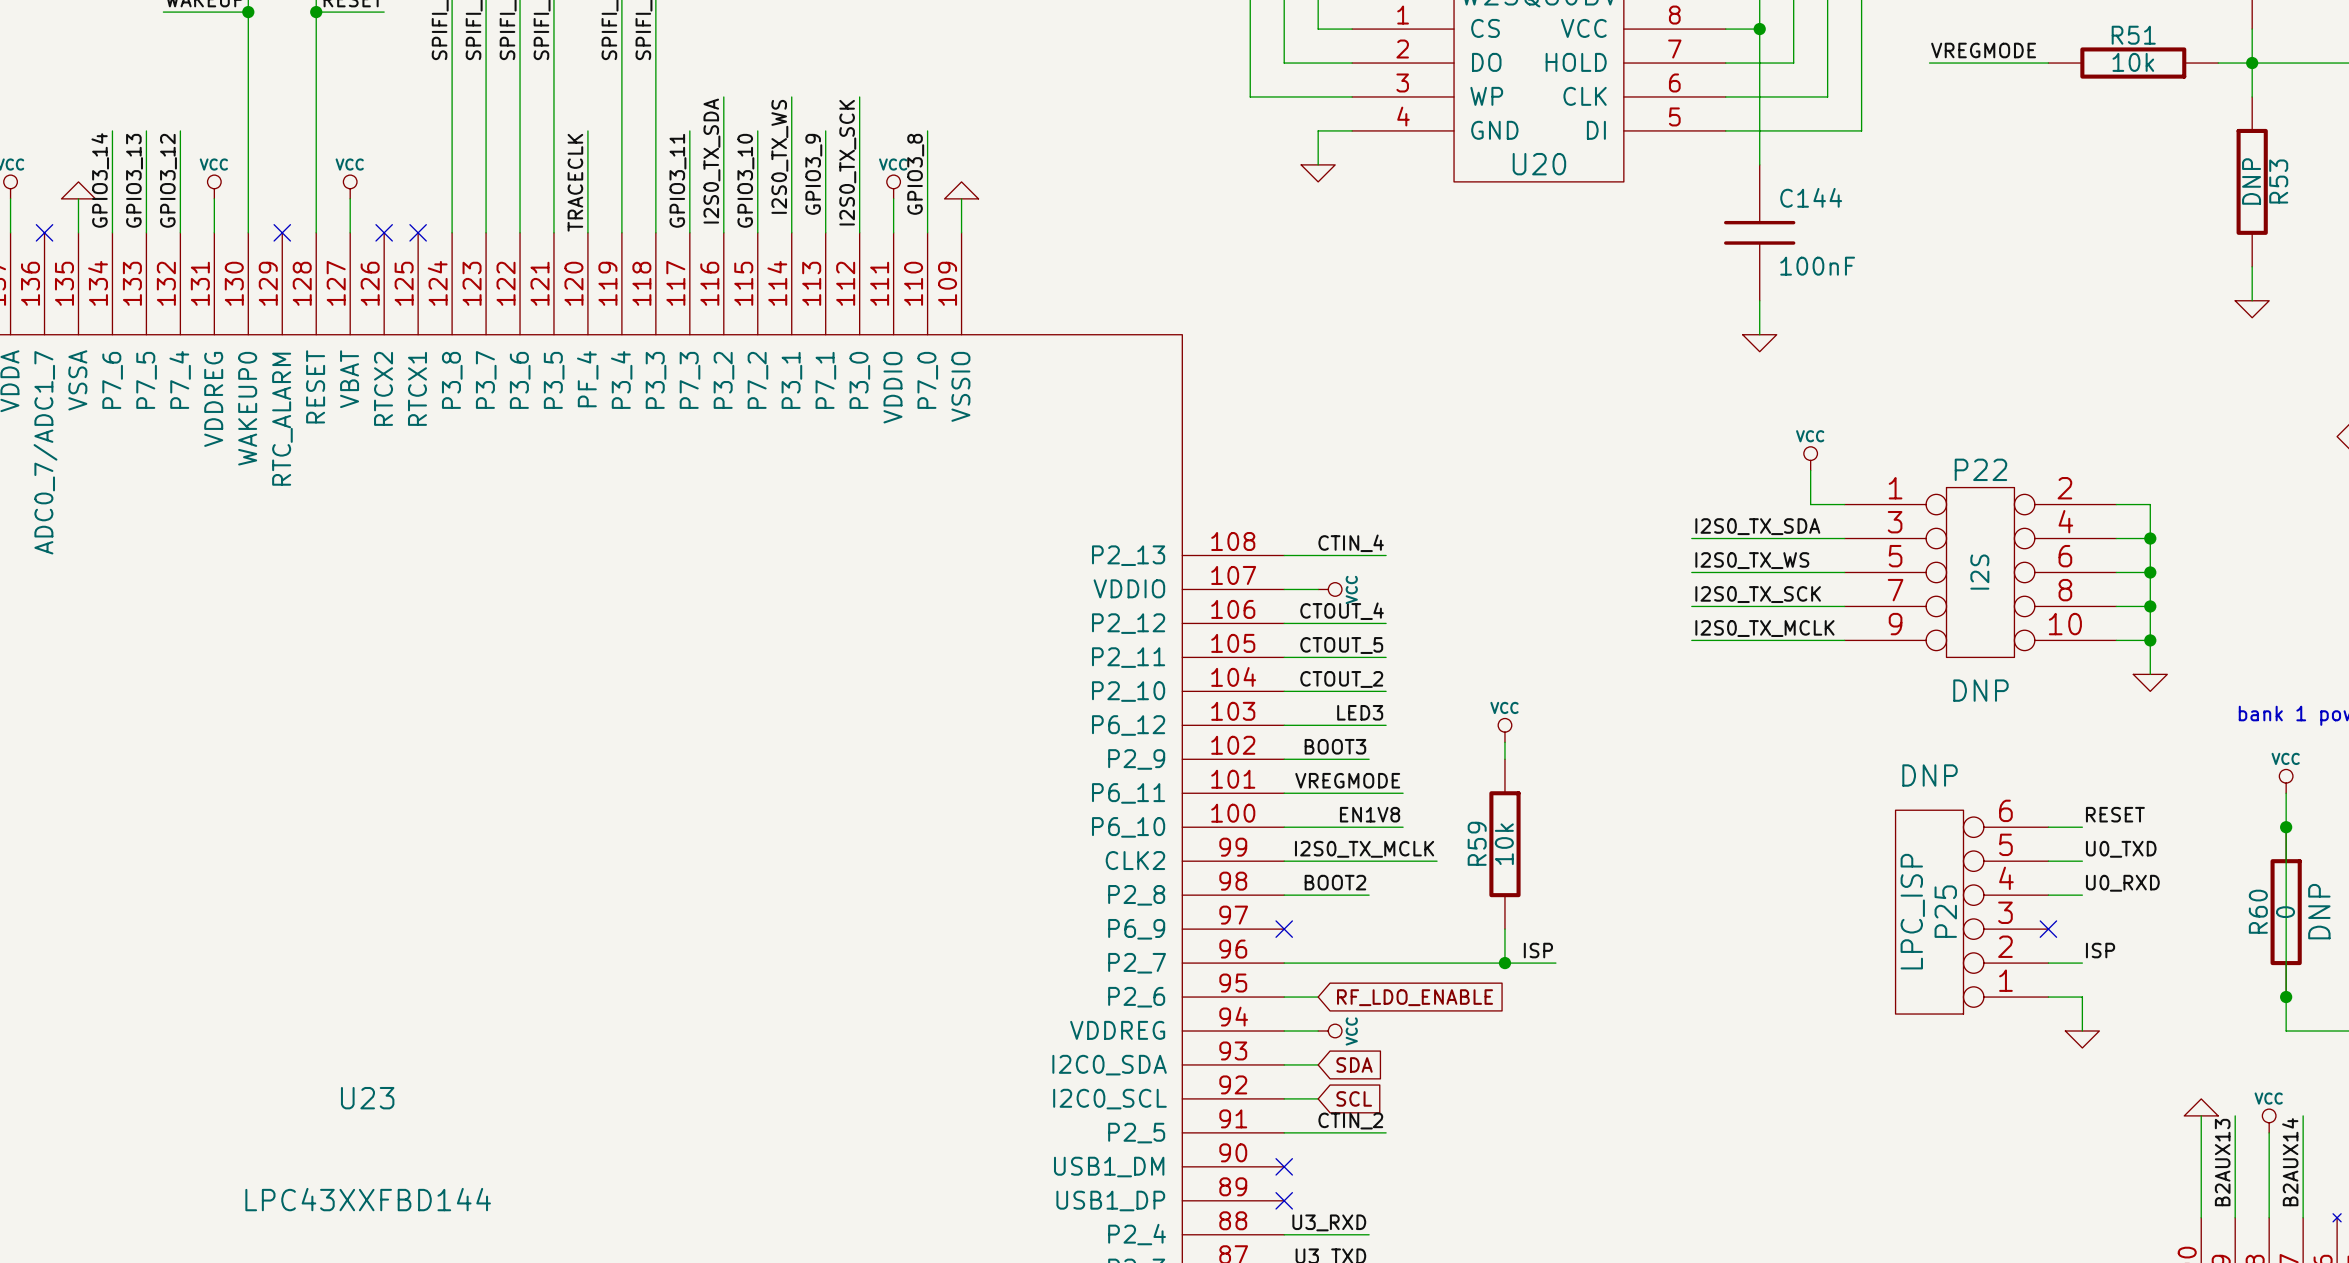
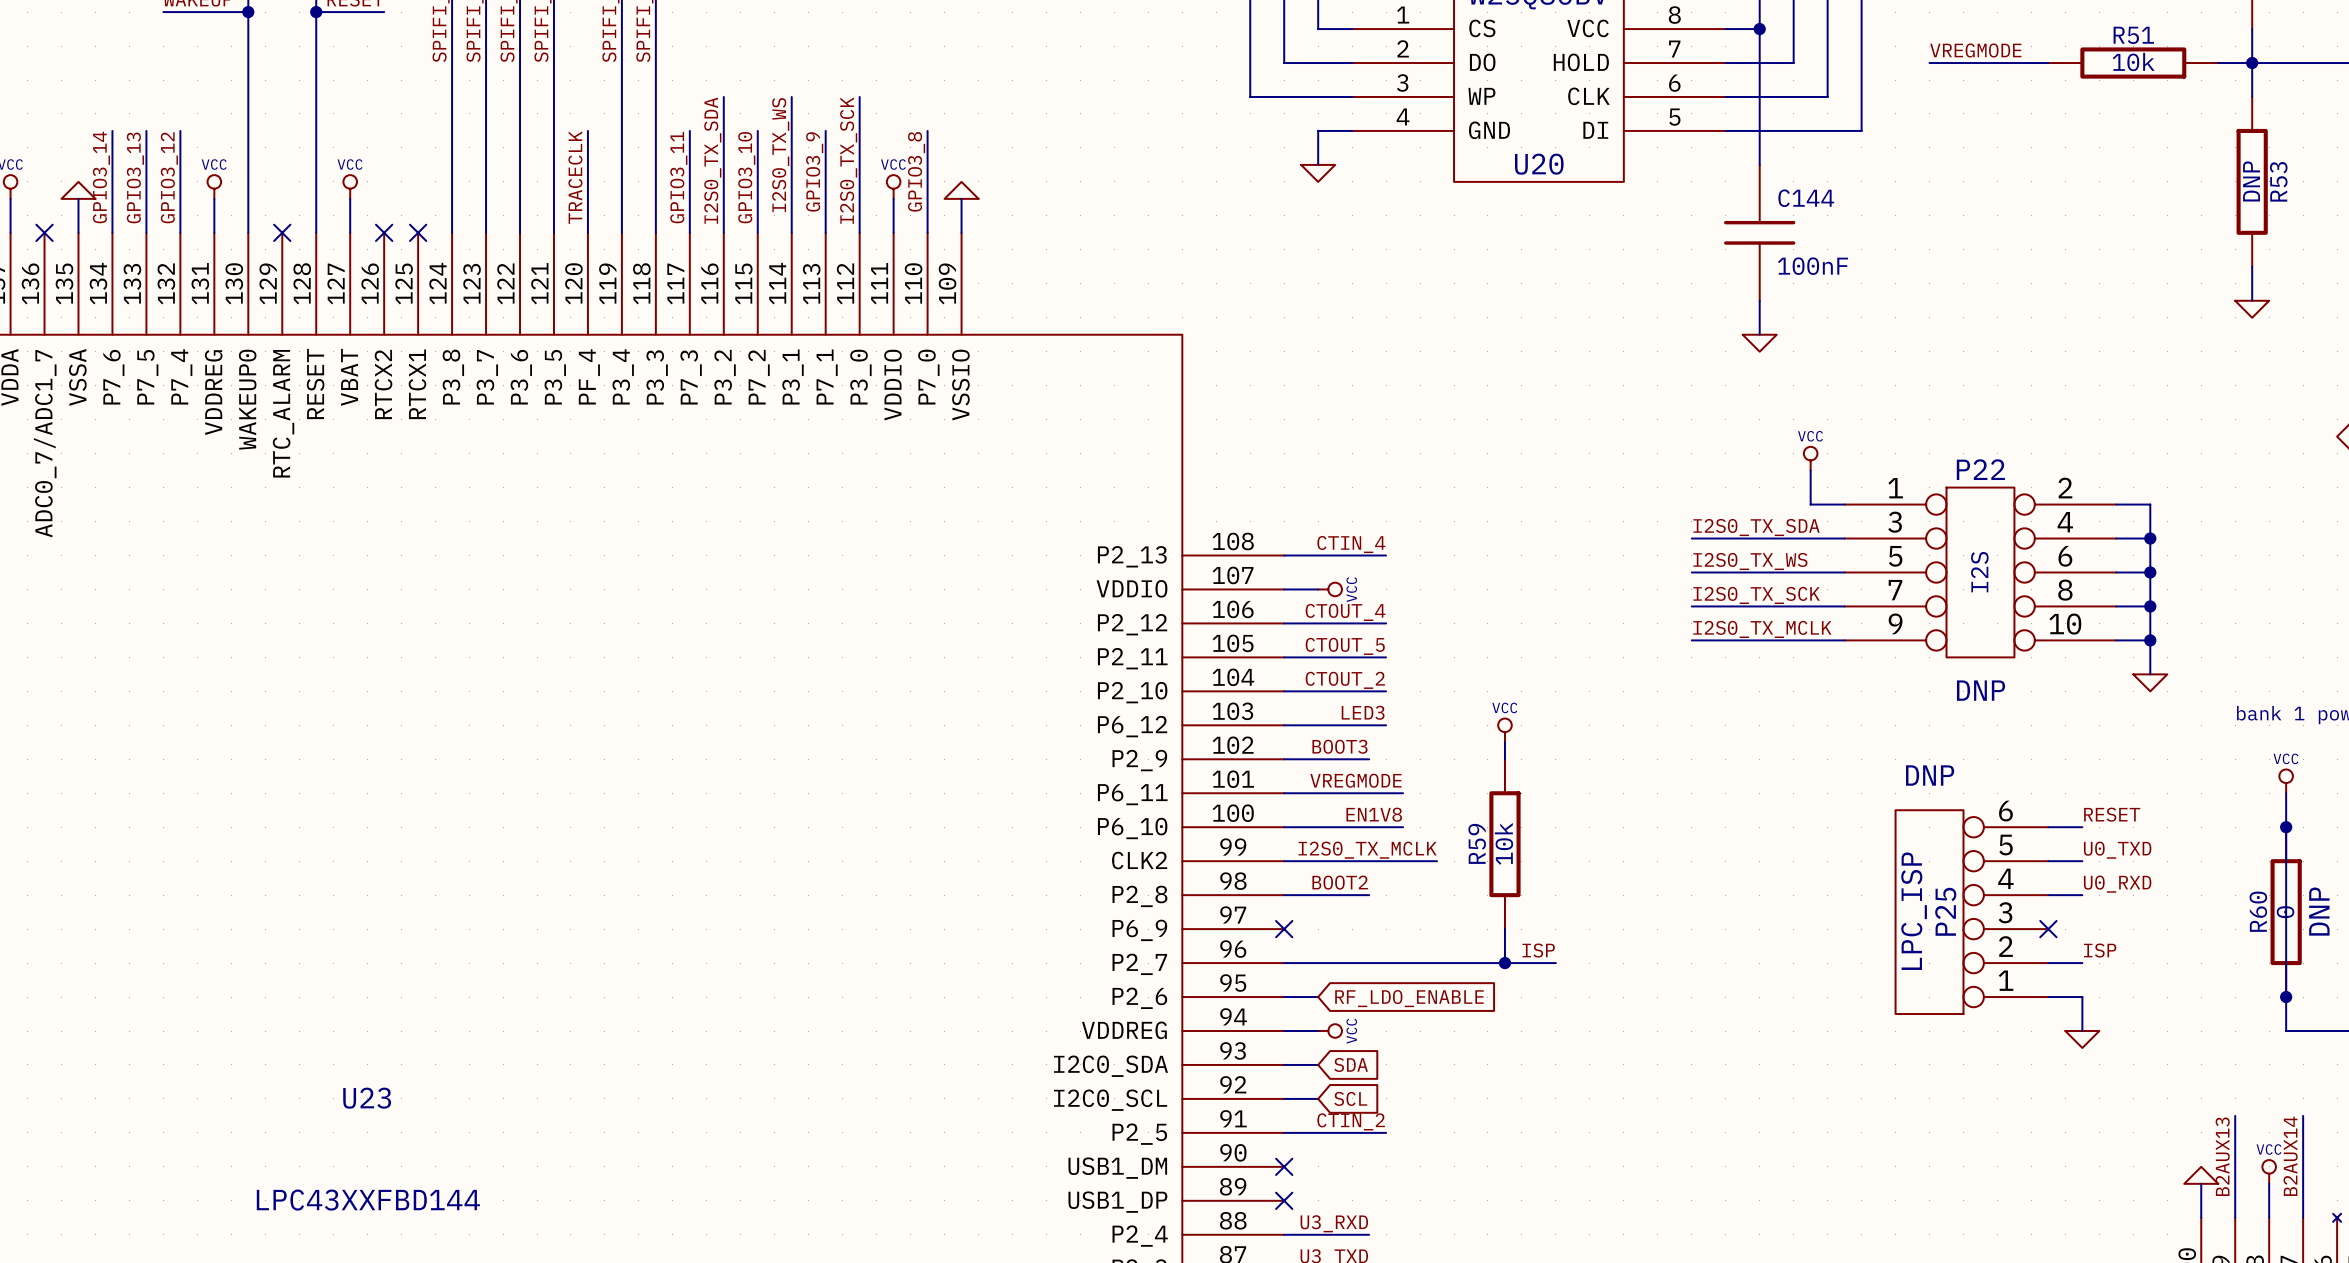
power symbol position: (2201, 1107) -> (2201, 1175)
wire: (2201, 1115) (2201, 1183) -> none
power symbol position: VCC (2269, 1121) -> VCC (2269, 1171)
wire: (2269, 1132) (2269, 1183) -> none

